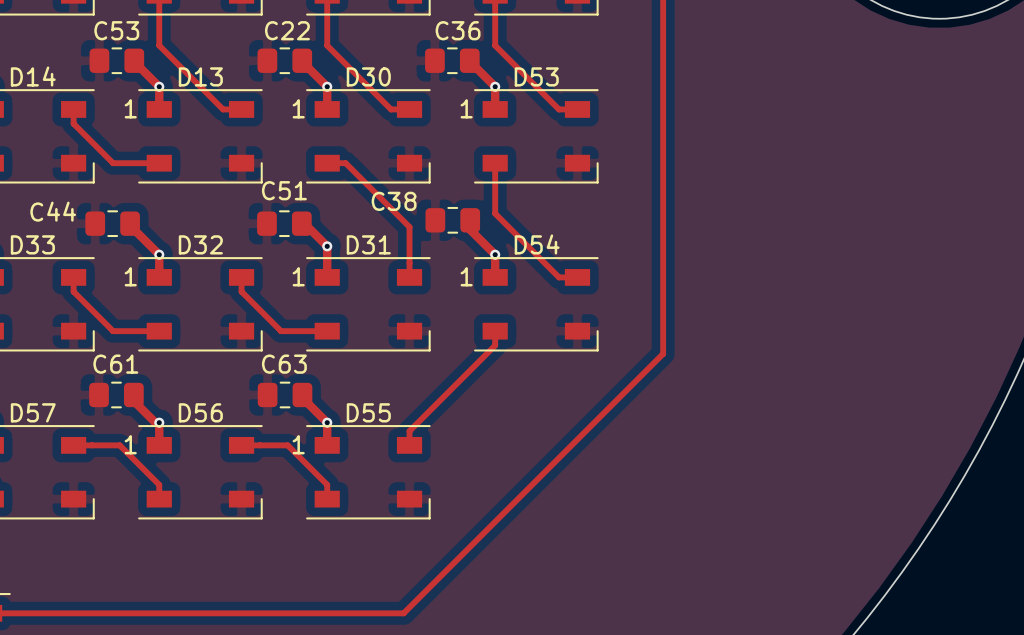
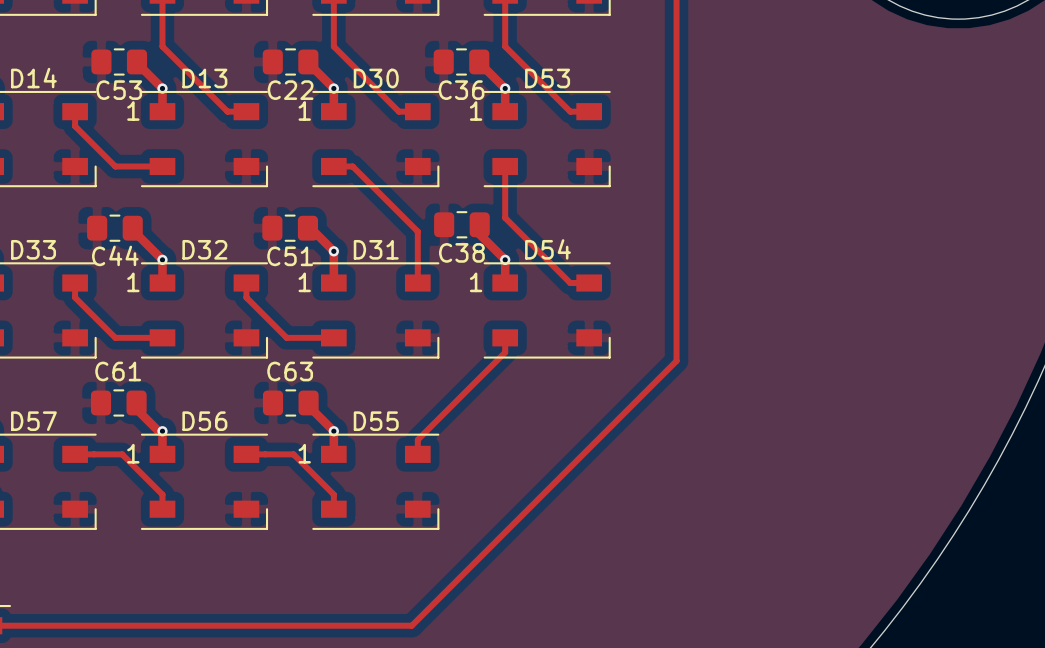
C53 name position: C53 (116, 30) -> C53 (119, 90)
C22 name position: C22 (287, 30) -> C22 (290, 90)
C36 name position: C36 (458, 30) -> C36 (461, 90)
C51 name position: C51 (284, 190) -> C51 (290, 256)
C38 name position: C38 (394, 201) -> C38 (461, 252)
C44 name position: C44 (53, 211) -> C44 (115, 255)

